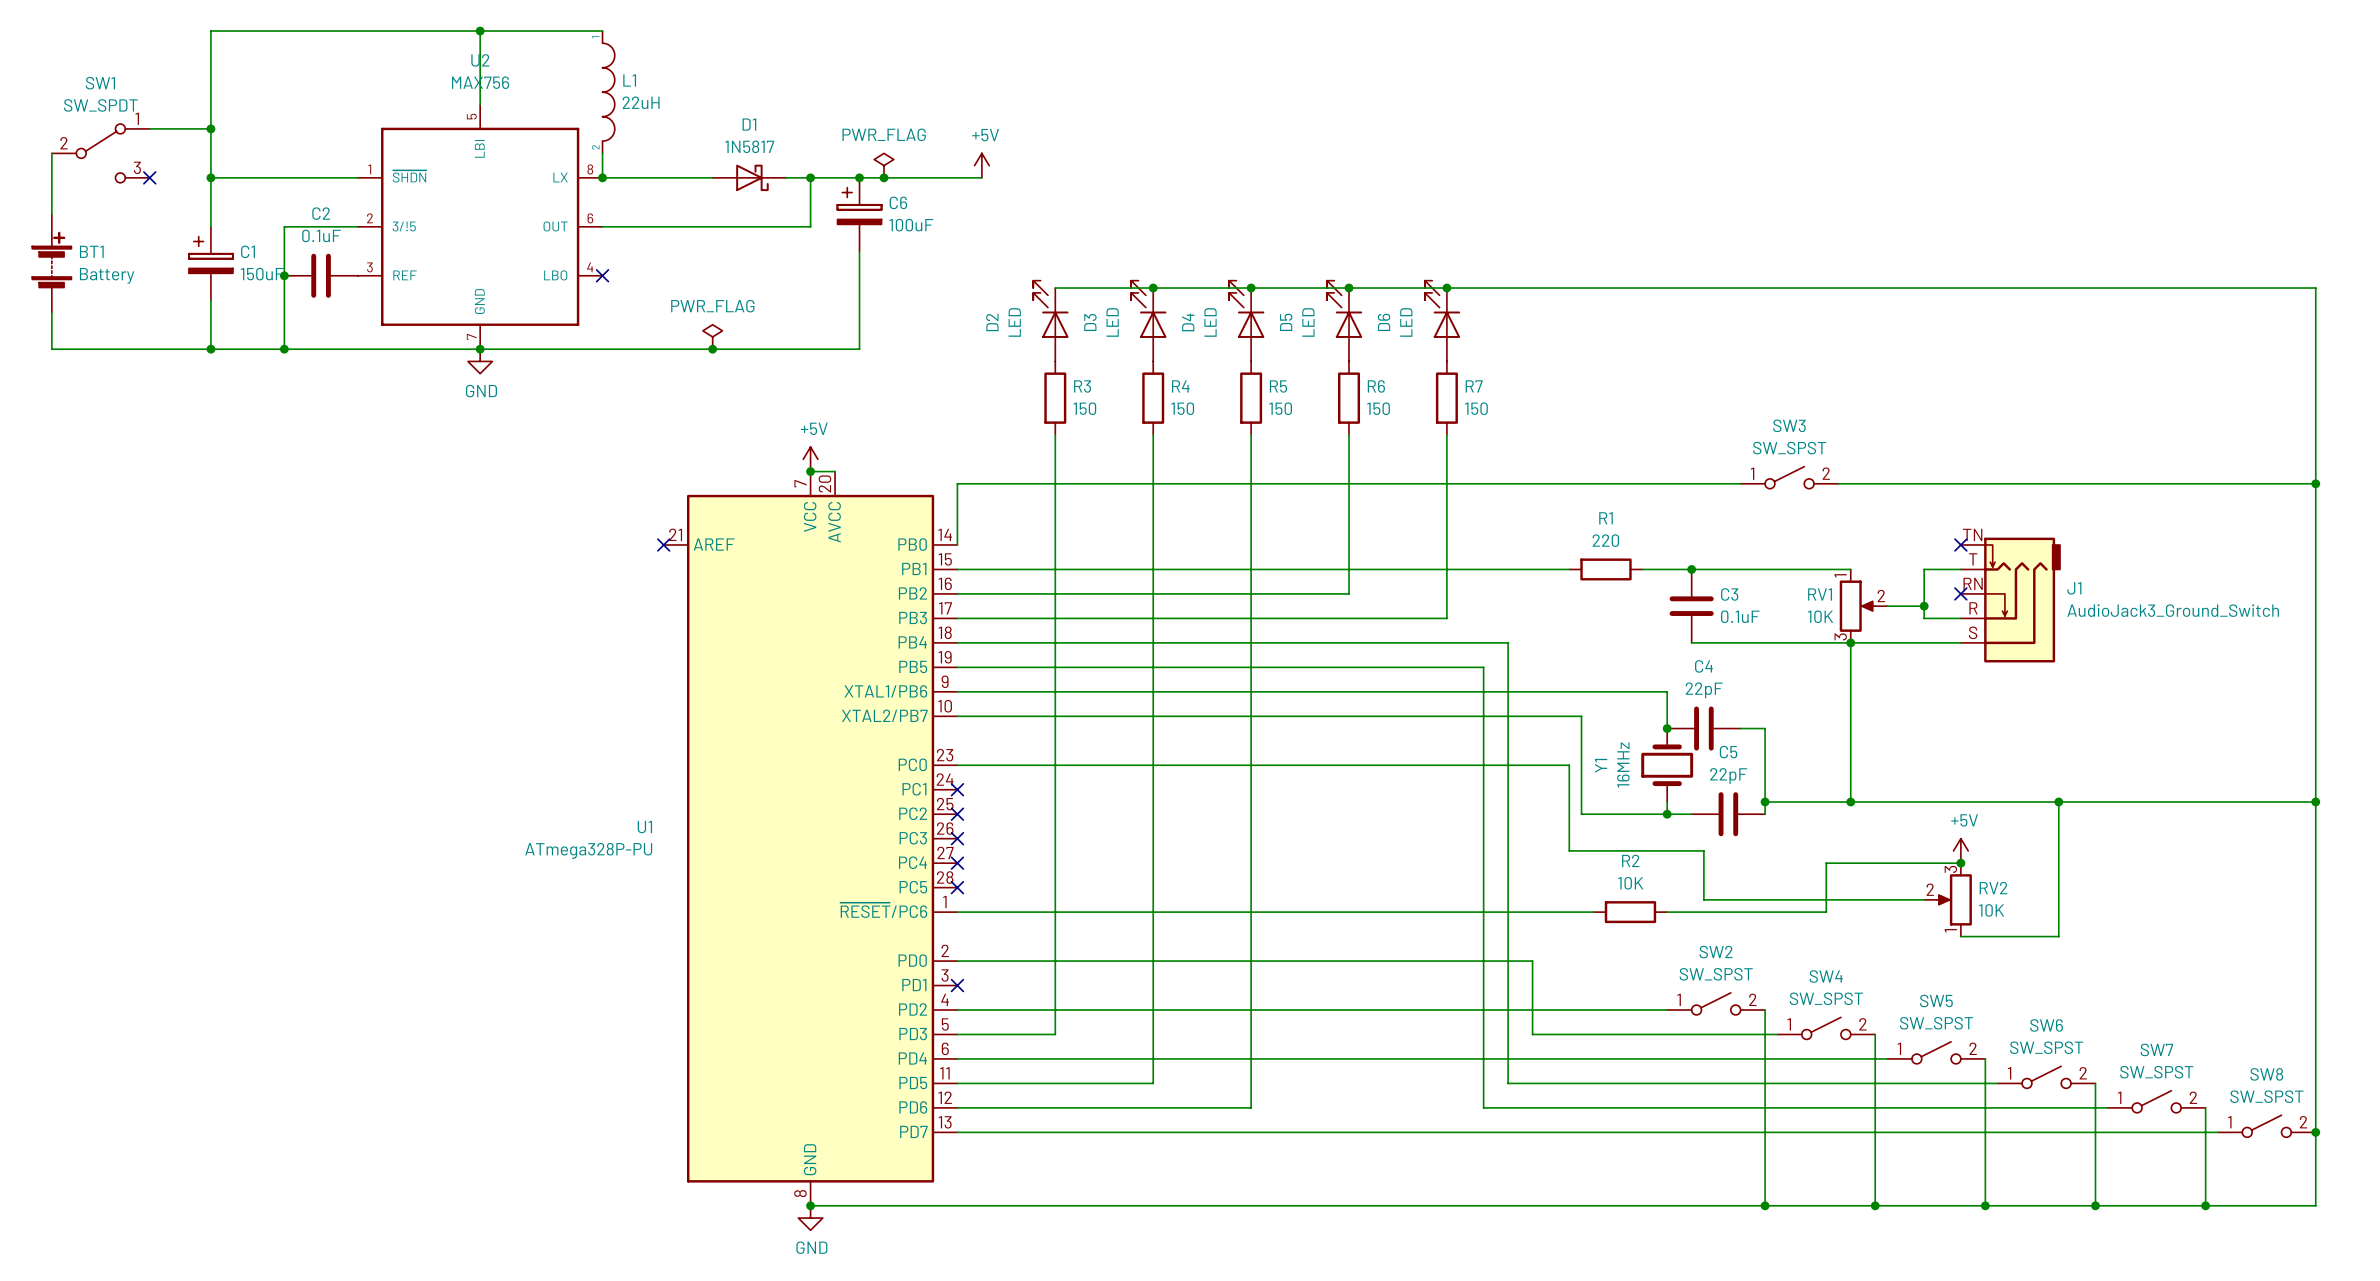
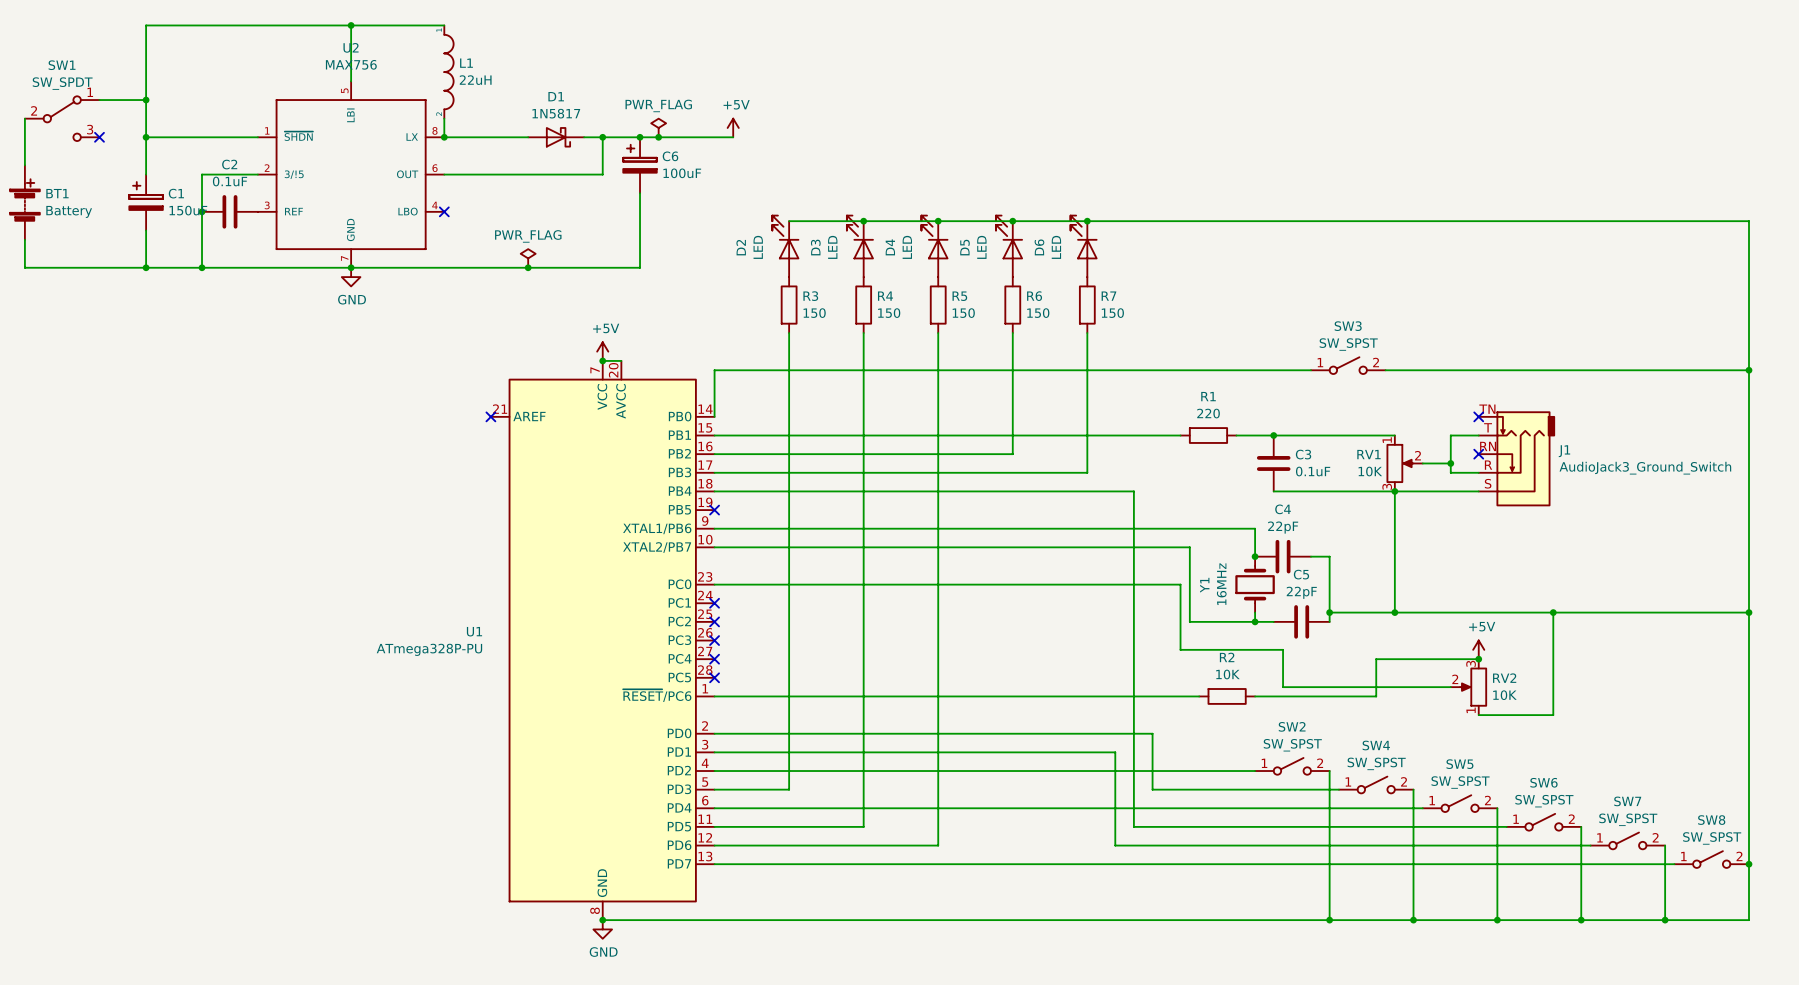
wire: (957, 667) (1483, 667) (1483, 985) -> (714, 752) (1115, 752)
no-connect mark: none -> (714, 510)
no-connect mark: (957, 985) -> none

